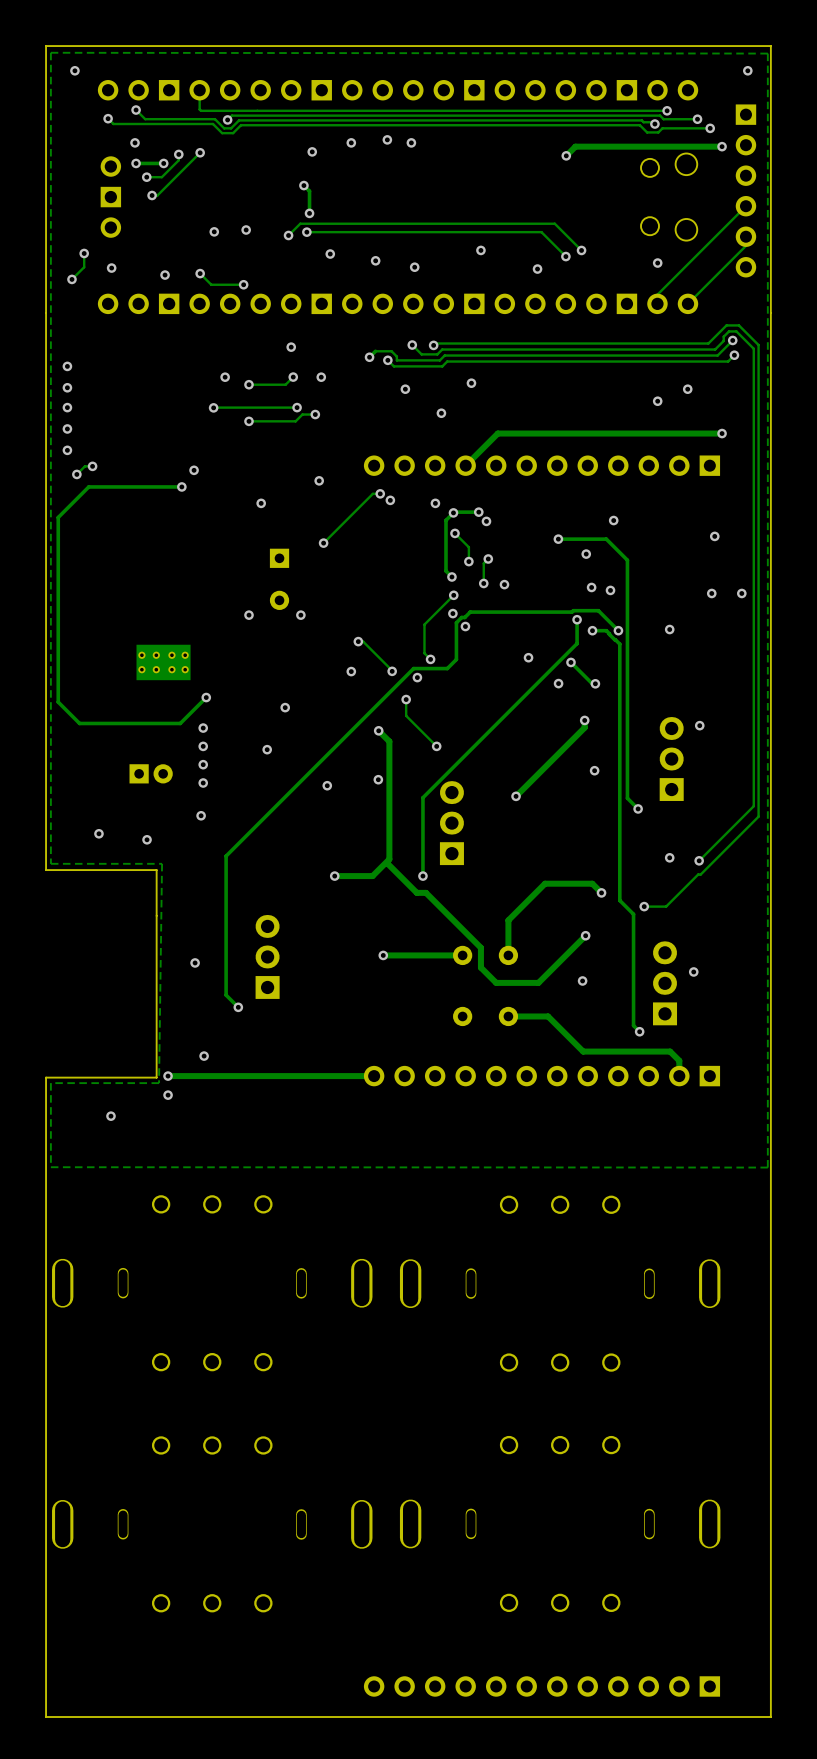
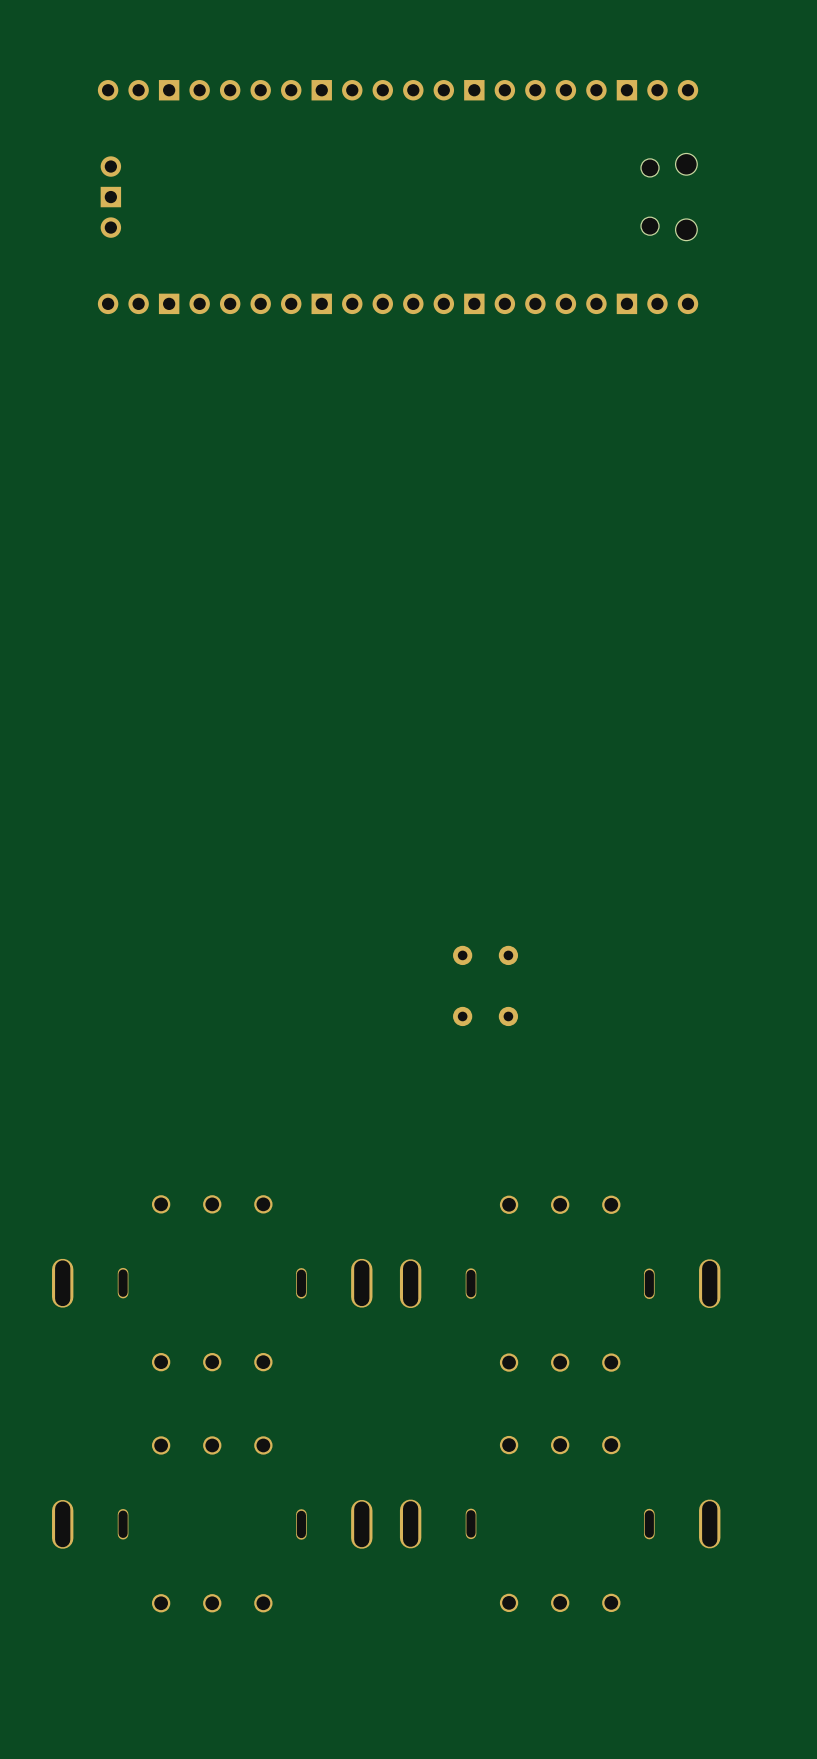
board edge: (770, 46) (770, 1717) (46, 1717) (46, 1077) (156, 1077) (156, 870) (46, 870) (46, 46) (770, 46) -> none
zone outline: (50, 52) (50, 863) (162, 863) (159, 1083) (50, 1083) (50, 1167) (767, 1167) (767, 53) (50, 52) -> none
via: (74, 70) -> none
via: (747, 70) -> none
track: (199, 90) (200, 110) (667, 110) -> none
track: (136, 110) (145, 119) (214, 119) (224, 128) (231, 128) (239, 120) (641, 120) (654, 124) -> none
via: (136, 110) -> none
via: (667, 110) -> none
track: (108, 118) (113, 123) (212, 123) (222, 133) (233, 133) (241, 125) (639, 125) (647, 132) (658, 132) (662, 128) (710, 128) -> none
via: (108, 118) -> none
via: (227, 119) -> none
track: (697, 119) (663, 119) (660, 115) (231, 115) (227, 119) -> none
via: (697, 119) -> none
via: (654, 124) -> none
via: (710, 128) -> none
via: (387, 139) -> none
via: (135, 142) -> none
via: (351, 142) -> none
via: (411, 142) -> none
track: (722, 146) (575, 146) (566, 155) -> none
via: (722, 146) -> none
via: (312, 151) -> none
track: (200, 152) (157, 195) (152, 195) -> none
via: (200, 152) -> none
track: (178, 154) (178, 160) (161, 177) (146, 177) -> none
via: (178, 154) -> none
via: (566, 155) -> none
via: (136, 163) -> none
track: (163, 163) (136, 163) -> none
via: (163, 163) -> none
via: (146, 177) -> none
track: (303, 185) (309, 191) (309, 213) -> none
via: (303, 185) -> none
part: (745, 190) -> none
via: (152, 195) -> none
track: (745, 206) (657, 294) (657, 303) -> none
via: (309, 213) -> none
via: (246, 230) -> none
via: (214, 231) -> none
track: (306, 232) (541, 232) (565, 256) -> none
via: (306, 232) -> none
track: (288, 235) (300, 223) (554, 223) (581, 250) -> none
via: (288, 235) -> none
track: (745, 236) (745, 245) (687, 303) -> none
via: (480, 250) -> none
via: (581, 250) -> none
track: (84, 253) (84, 267) (71, 279) -> none
via: (84, 253) -> none
via: (330, 254) -> none
via: (565, 256) -> none
via: (375, 260) -> none
via: (657, 263) -> none
via: (414, 267) -> none
via: (111, 268) -> none
via: (537, 269) -> none
track: (200, 273) (211, 284) (243, 284) -> none
via: (200, 273) -> none
via: (165, 275) -> none
via: (71, 279) -> none
via: (243, 284) -> none
track: (732, 340) (717, 355) (444, 355) (439, 360) (396, 360) (396, 356) (391, 351) (375, 351) (369, 357) -> none
via: (732, 340) -> none
track: (412, 345) (421, 354) (437, 354) (442, 349) (715, 349) (723, 340) (723, 336) (729, 331) (736, 331) (753, 348) (753, 806) (699, 860) -> none
via: (412, 345) -> none
track: (433, 345) (435, 343) (708, 343) (726, 325) (738, 325) (758, 345) (758, 816) (666, 906) (644, 906) -> none
via: (433, 345) -> none
via: (291, 347) -> none
track: (734, 355) (728, 361) (447, 361) (442, 366) (393, 366) (387, 360) -> none
via: (734, 355) -> none
via: (369, 357) -> none
via: (387, 360) -> none
via: (67, 366) -> none
via: (225, 377) -> none
track: (293, 377) (285, 384) (248, 384) -> none
via: (293, 377) -> none
via: (321, 377) -> none
via: (471, 383) -> none
via: (248, 384) -> none
via: (67, 387) -> none
via: (405, 389) -> none
via: (687, 389) -> none
via: (657, 401) -> none
via: (67, 407) -> none
via: (213, 407) -> none
track: (297, 407) (213, 407) -> none
via: (297, 407) -> none
via: (441, 413) -> none
track: (315, 414) (302, 414) (295, 421) (248, 421) -> none
via: (315, 414) -> none
via: (248, 421) -> none
via: (67, 428) -> none
track: (722, 433) (497, 433) (465, 465) -> none
via: (722, 433) -> none
via: (67, 450) -> none
part: (541, 465) -> none
track: (92, 466) (84, 466) (76, 474) -> none
via: (92, 466) -> none
via: (194, 470) -> none
via: (76, 474) -> none
via: (319, 480) -> none
track: (181, 486) (88, 486) (58, 517) (58, 702) (79, 723) (180, 723) (206, 697) -> none
via: (181, 486) -> none
track: (380, 493) (372, 493) (323, 543) -> none
via: (380, 493) -> none
via: (390, 500) -> none
via: (261, 503) -> none
via: (435, 503) -> none
via: (453, 512) -> none
track: (478, 512) (454, 512) (445, 520) (445, 571) (451, 576) -> none
via: (478, 512) -> none
via: (613, 520) -> none
via: (486, 521) -> none
track: (455, 533) (468, 547) (468, 561) -> none
via: (455, 533) -> none
via: (714, 536) -> none
track: (558, 539) (606, 539) (627, 560) (627, 798) (638, 808) -> none
via: (558, 539) -> none
via: (323, 543) -> none
via: (586, 554) -> none
via: (488, 558) -> none
track: (486, 560) (483, 563) (483, 583) -> none
via: (468, 561) -> none
via: (451, 576) -> none
part: (279, 579) -> none
via: (483, 583) -> none
via: (504, 584) -> none
via: (591, 587) -> none
via: (610, 590) -> none
via: (711, 593) -> none
via: (741, 593) -> none
track: (453, 595) (424, 624) (424, 653) (430, 659) -> none
via: (453, 595) -> none
via: (452, 613) -> none
via: (248, 615) -> none
via: (300, 615) -> none
track: (577, 619) (577, 643) (422, 797) (422, 876) -> none
via: (577, 619) -> none
via: (465, 626) -> none
via: (669, 629) -> none
track: (592, 630) (606, 630) (619, 644) (619, 900) (633, 914) (633, 1025) (639, 1031) -> none
via: (592, 630) -> none
track: (618, 630) (598, 610) (470, 612) (464, 617) (461, 617) (456, 622) (456, 659) (447, 668) (413, 668) (226, 856) (226, 995) (238, 1007) -> none
via: (618, 630) -> none
track: (358, 641) (363, 641) (392, 671) -> none
via: (358, 641) -> none
via: (528, 657) -> none
via: (430, 659) -> none
part: (163, 662) -> none
track: (570, 662) (592, 683) (595, 683) -> none
via: (570, 662) -> none
via: (351, 671) -> none
via: (392, 671) -> none
via: (417, 677) -> none
via: (558, 683) -> none
via: (595, 683) -> none
via: (206, 697) -> none
track: (406, 699) (406, 715) (436, 746) -> none
via: (406, 699) -> none
via: (285, 707) -> none
track: (584, 720) (584, 727) (516, 796) -> none
via: (584, 720) -> none
via: (699, 725) -> none
via: (203, 728) -> none
track: (378, 730) (389, 741) (389, 859) (372, 876) (334, 876) -> none
via: (378, 730) -> none
via: (203, 746) -> none
via: (436, 746) -> none
via: (267, 749) -> none
part: (671, 759) -> none
via: (203, 764) -> none
via: (594, 770) -> none
part: (151, 773) -> none
via: (378, 779) -> none
via: (203, 783) -> none
via: (327, 785) -> none
via: (516, 796) -> none
via: (638, 808) -> none
via: (201, 815) -> none
part: (451, 823) -> none
via: (98, 833) -> none
via: (147, 839) -> none
via: (669, 857) -> none
via: (699, 860) -> none
track: (387, 862) (416, 892) (426, 892) (480, 947) (480, 967) (496, 982) (538, 982) (585, 935) -> none
via: (334, 876) -> none
via: (422, 876) -> none
track: (601, 892) (592, 883) (545, 883) (508, 920) (508, 955) -> none
via: (601, 892) -> none
via: (644, 906) -> none
via: (585, 935) -> none
via: (383, 955) -> none
track: (462, 955) (383, 955) -> none
part: (267, 956) -> none
via: (195, 962) -> none
via: (693, 971) -> none
via: (582, 980) -> none
part: (665, 983) -> none
via: (238, 1007) -> none
track: (508, 1016) (548, 1016) (583, 1051) (670, 1051) (679, 1060) (679, 1076) -> none
via: (639, 1031) -> none
via: (204, 1056) -> none
via: (168, 1076) -> none
track: (374, 1076) (168, 1076) -> none
part: (541, 1076) -> none
via: (168, 1095) -> none
via: (110, 1116) -> none
part: (541, 1686) -> none

